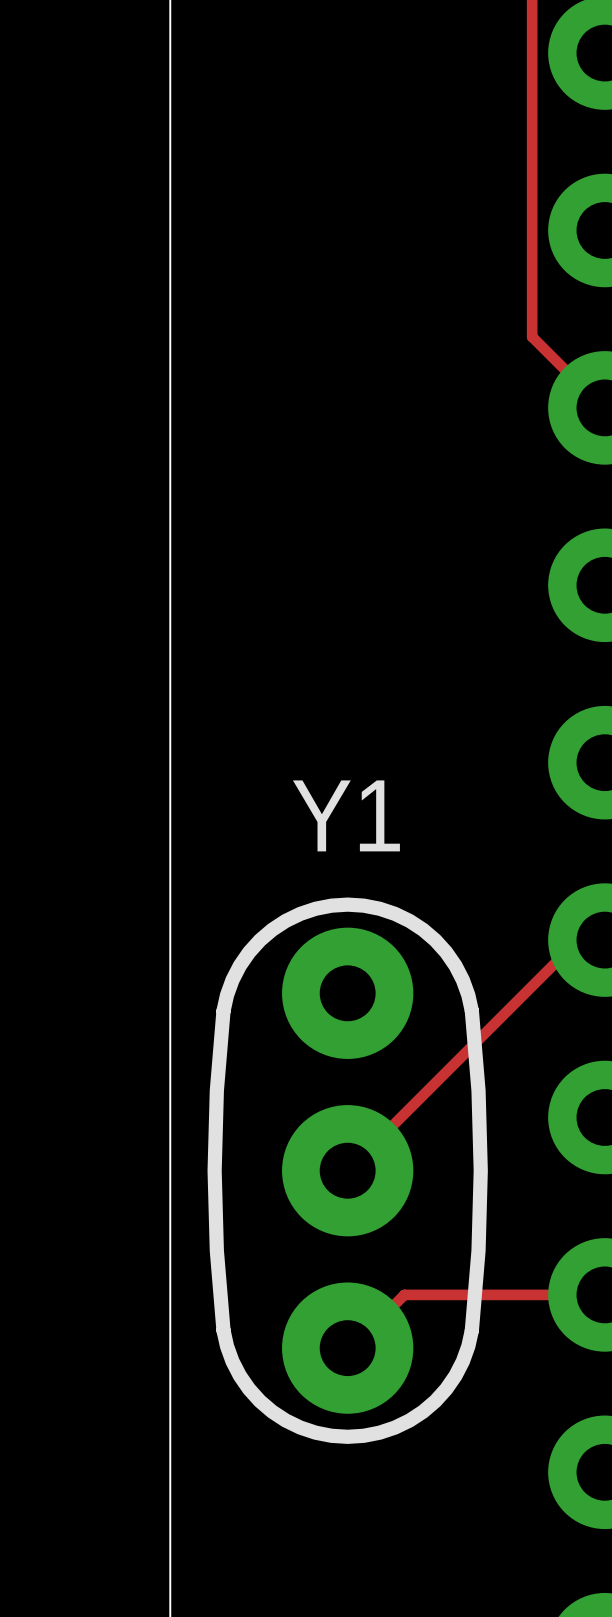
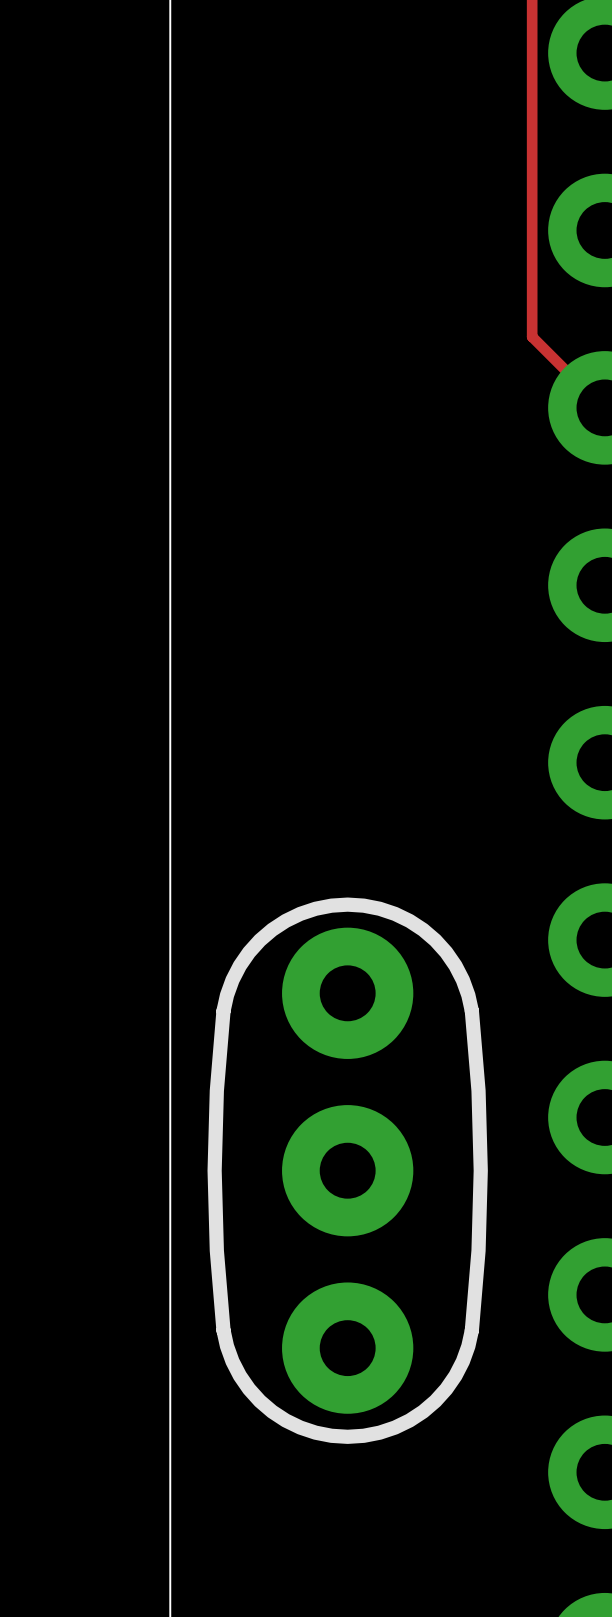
text: Y1 (346, 815) -> none
track: (604, 940) (596, 943) (574, 943) (347, 1170) -> none
track: (604, 1294) (404, 1294) (351, 1348) (347, 1348) -> none

